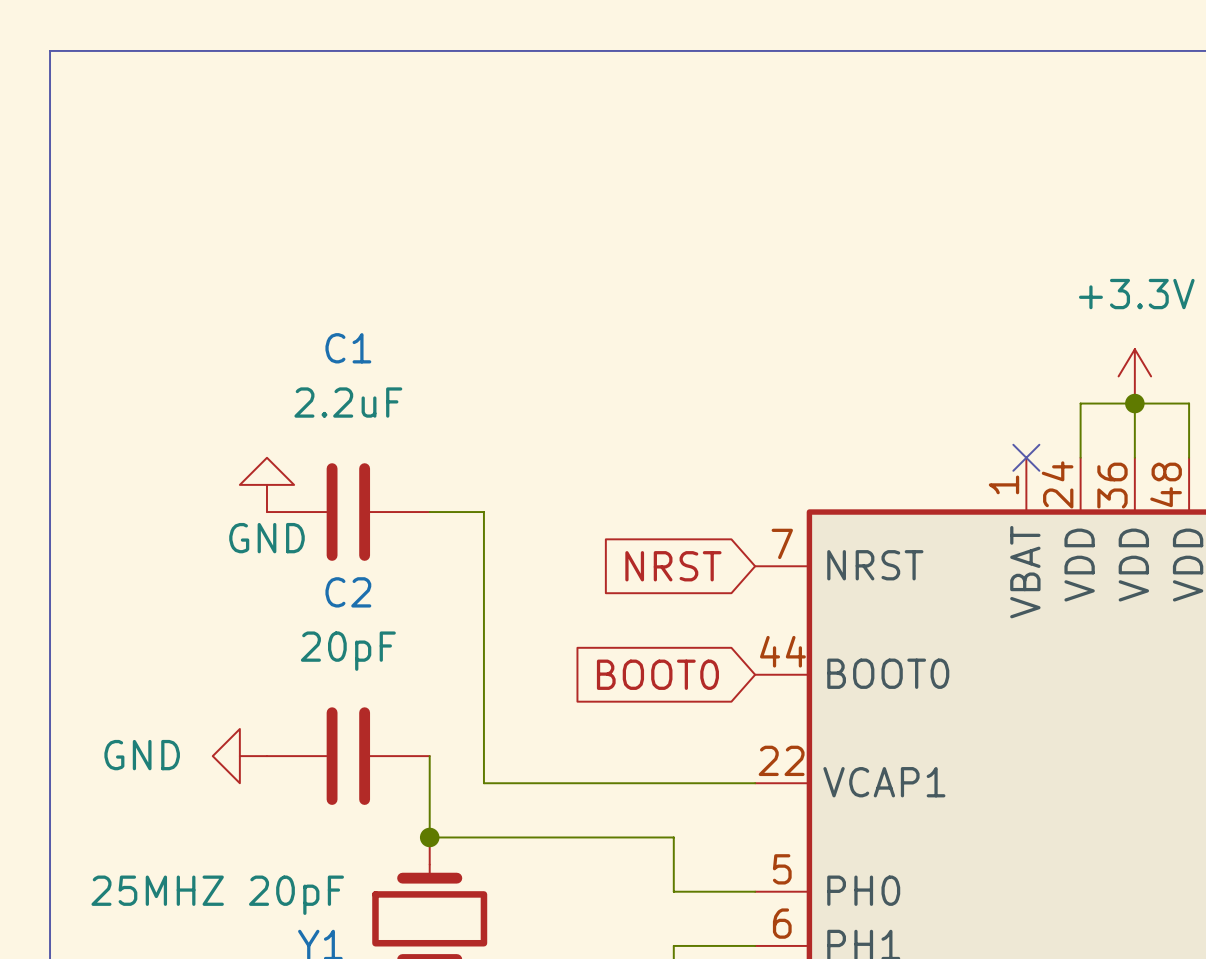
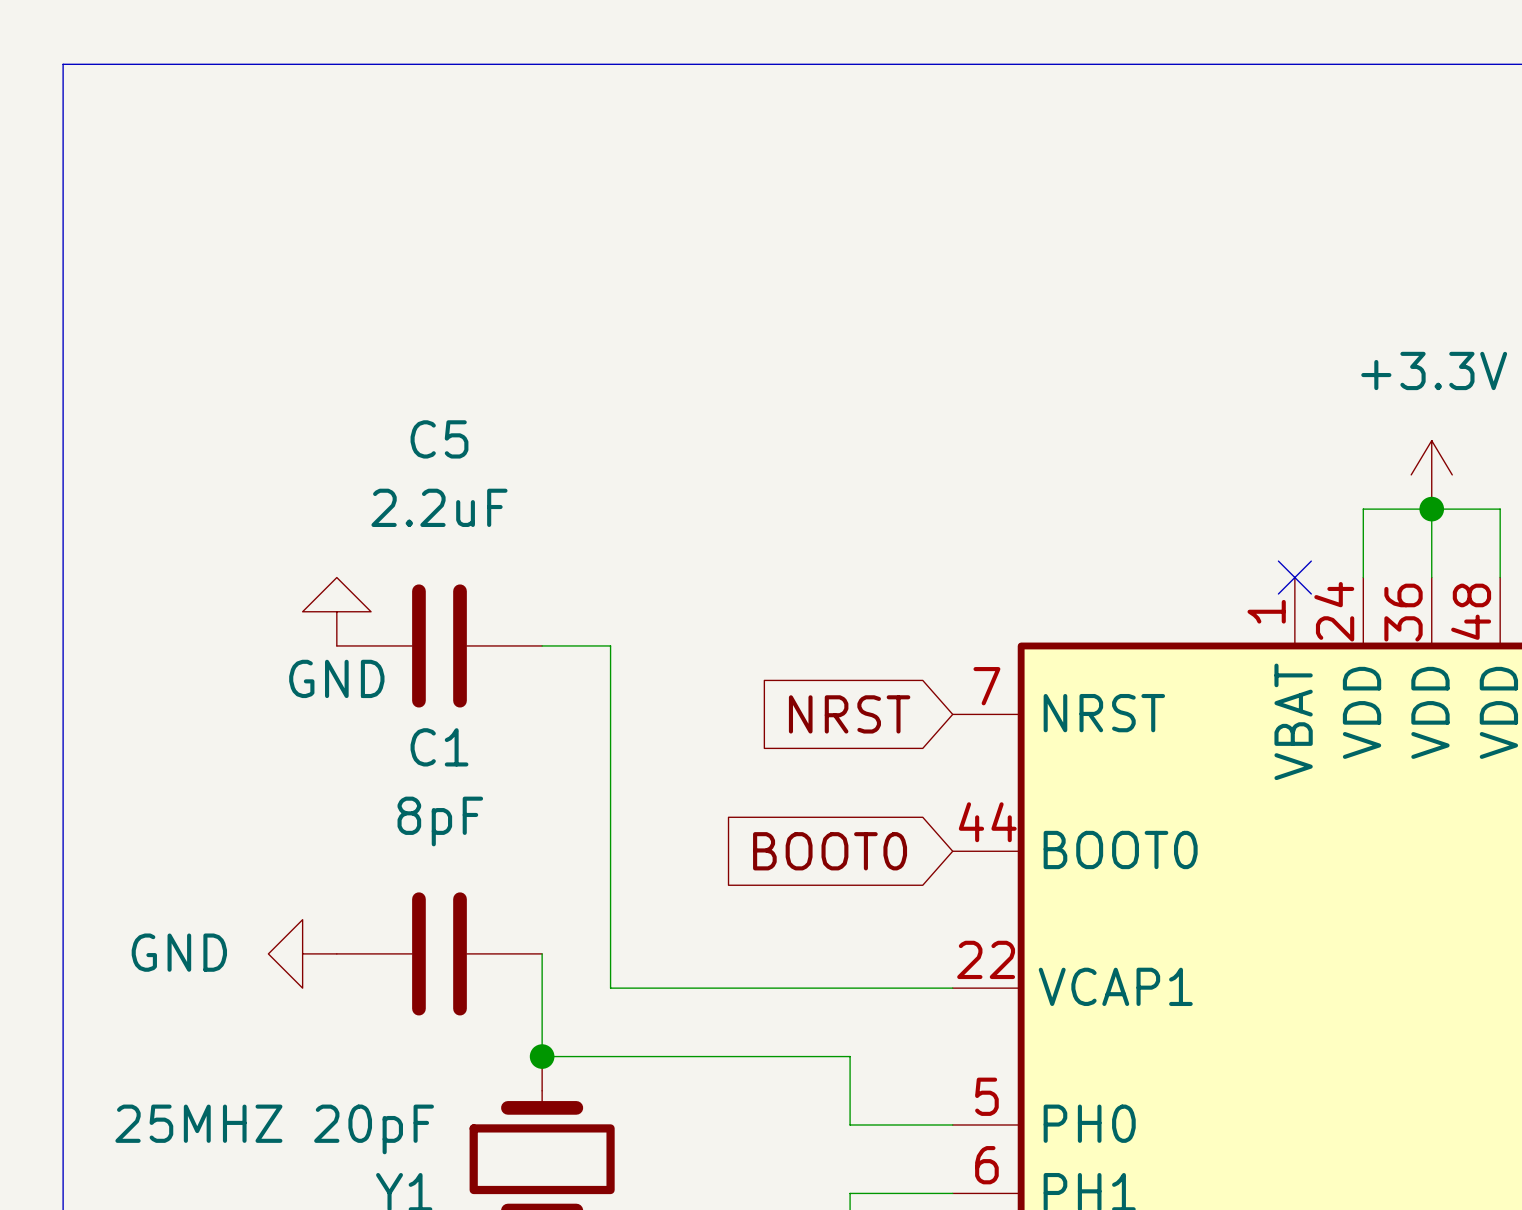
C1 name: C1 (348, 348) -> C5 (439, 439)
C2 name: C2 (348, 592) -> C1 (439, 747)
C2 value: 20pF (348, 651) -> 8pF (440, 821)

